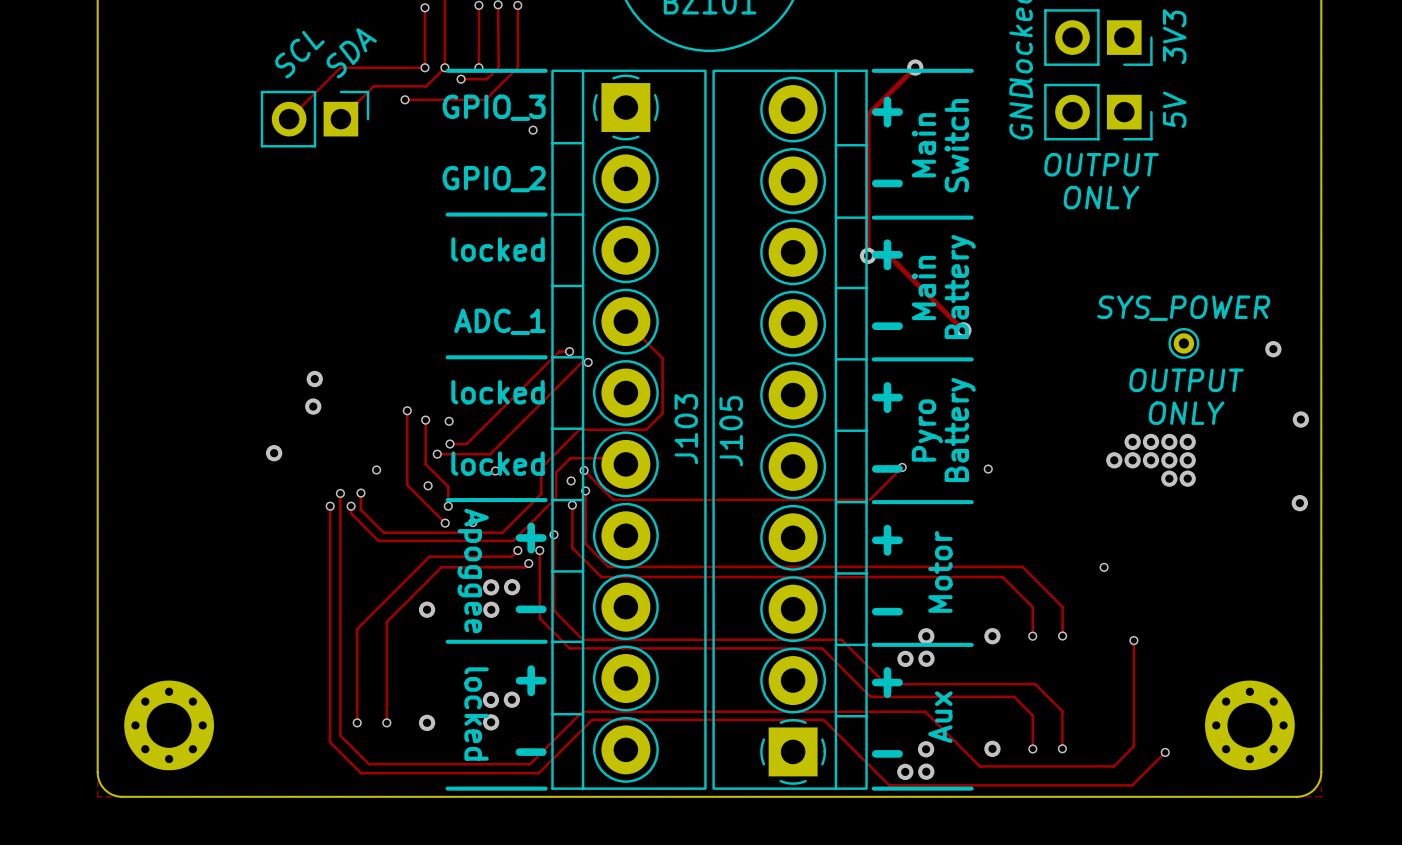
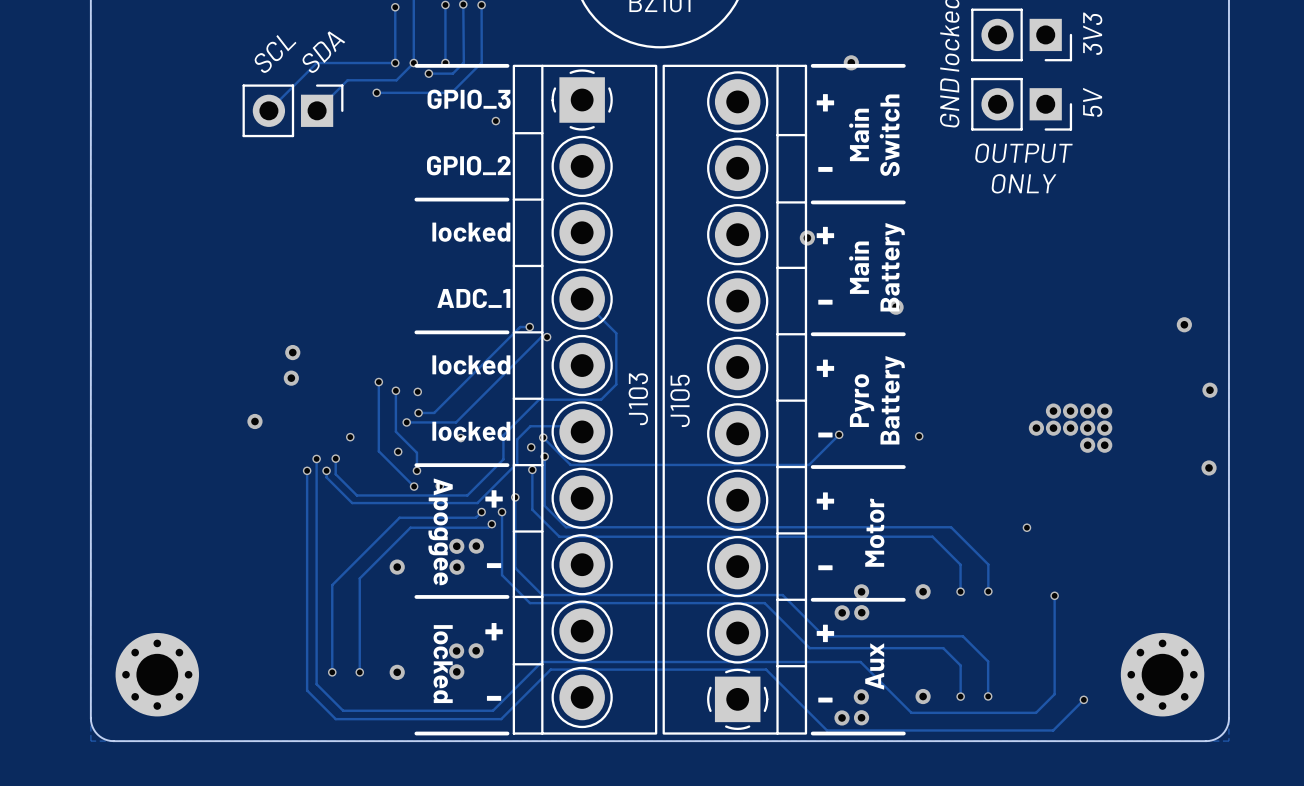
track: (915, 67) (867, 114) (867, 255) -> none
track: (868, 255) (888, 255) (963, 330) -> none
text: SYS_POWER (1183, 308) -> none
part: (1183, 343) -> none
text: OUTPUT (1186, 380) -> none
text: ONLY (1186, 413) -> none

